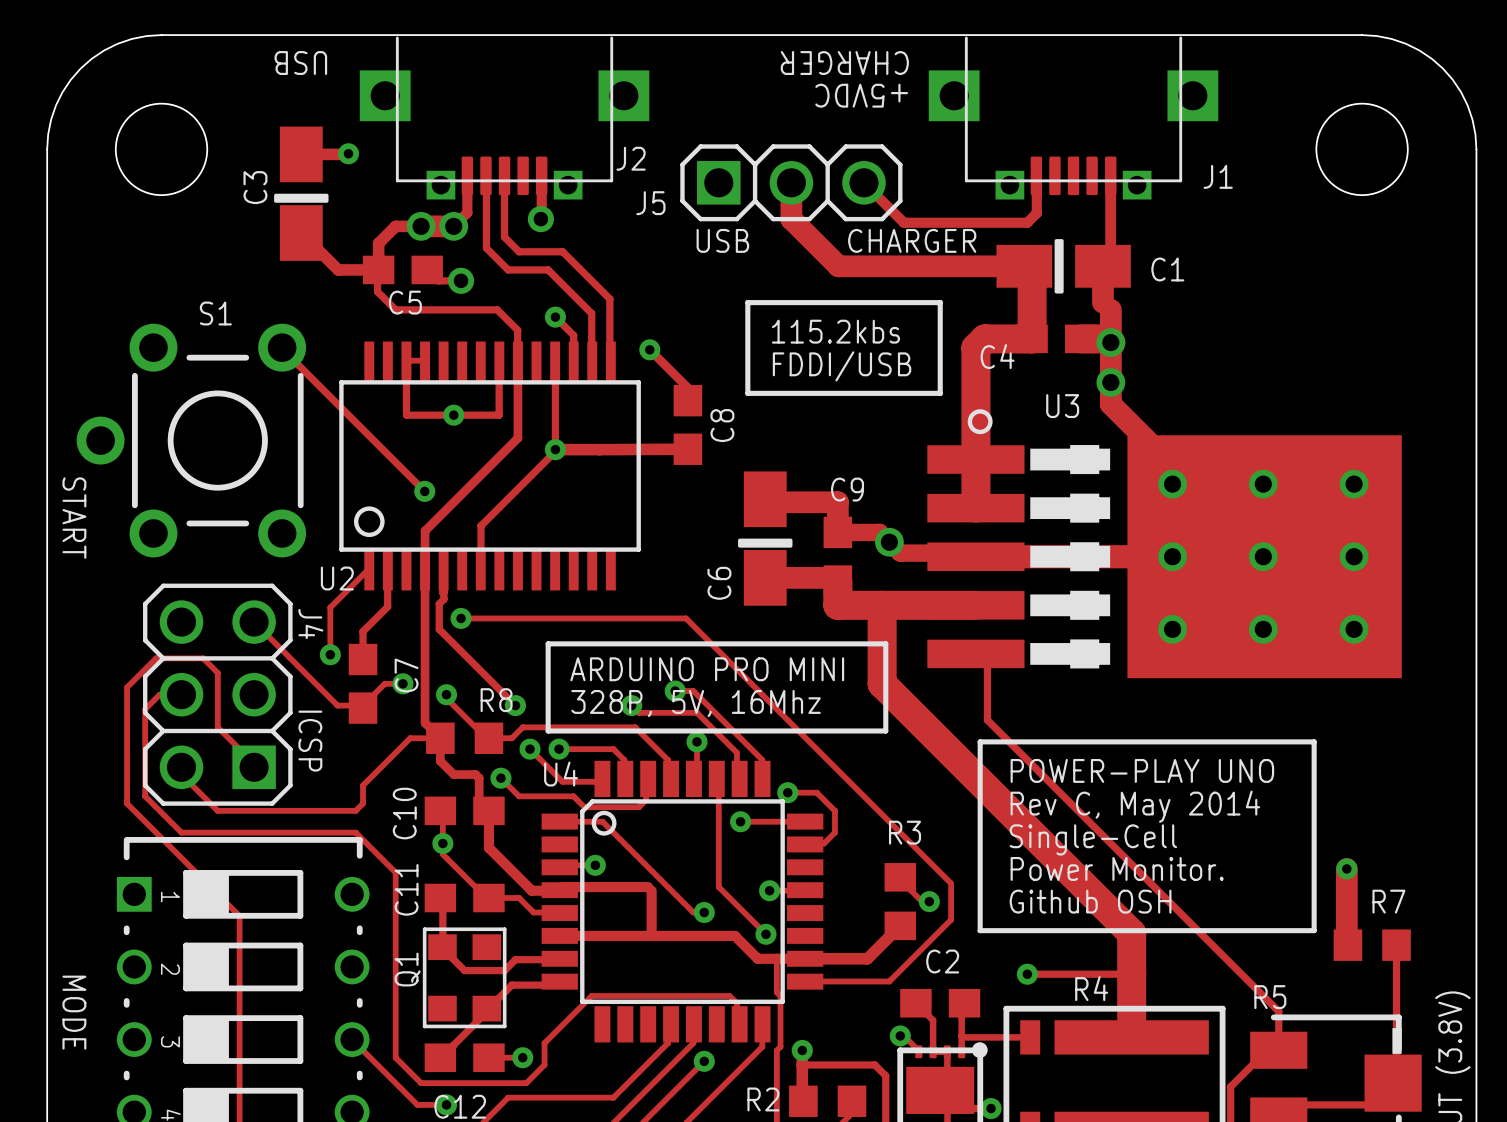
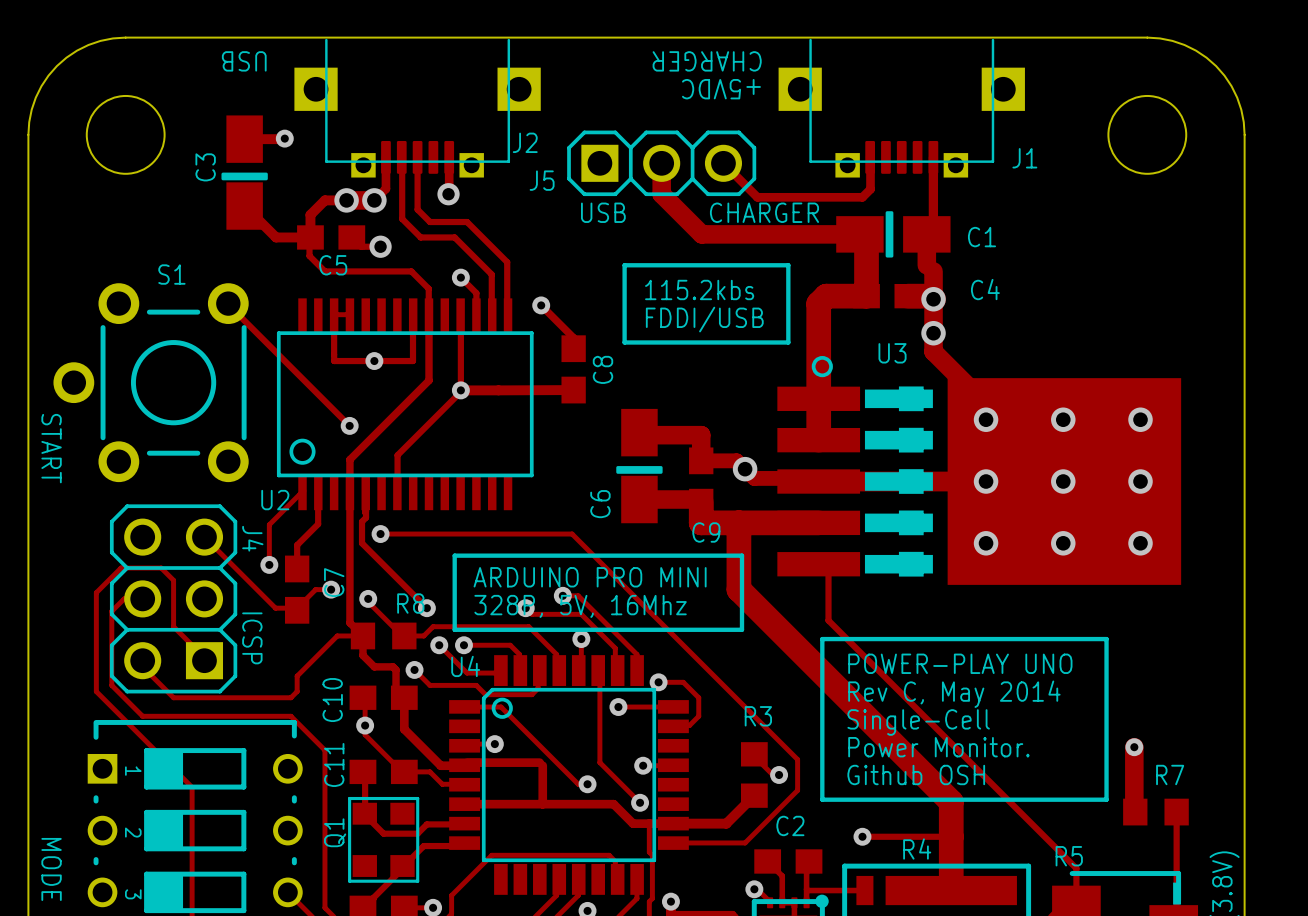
C4 name position: C4 (997, 356) -> C4 (985, 289)
C9 name position: C9 (847, 489) -> C9 (706, 532)

